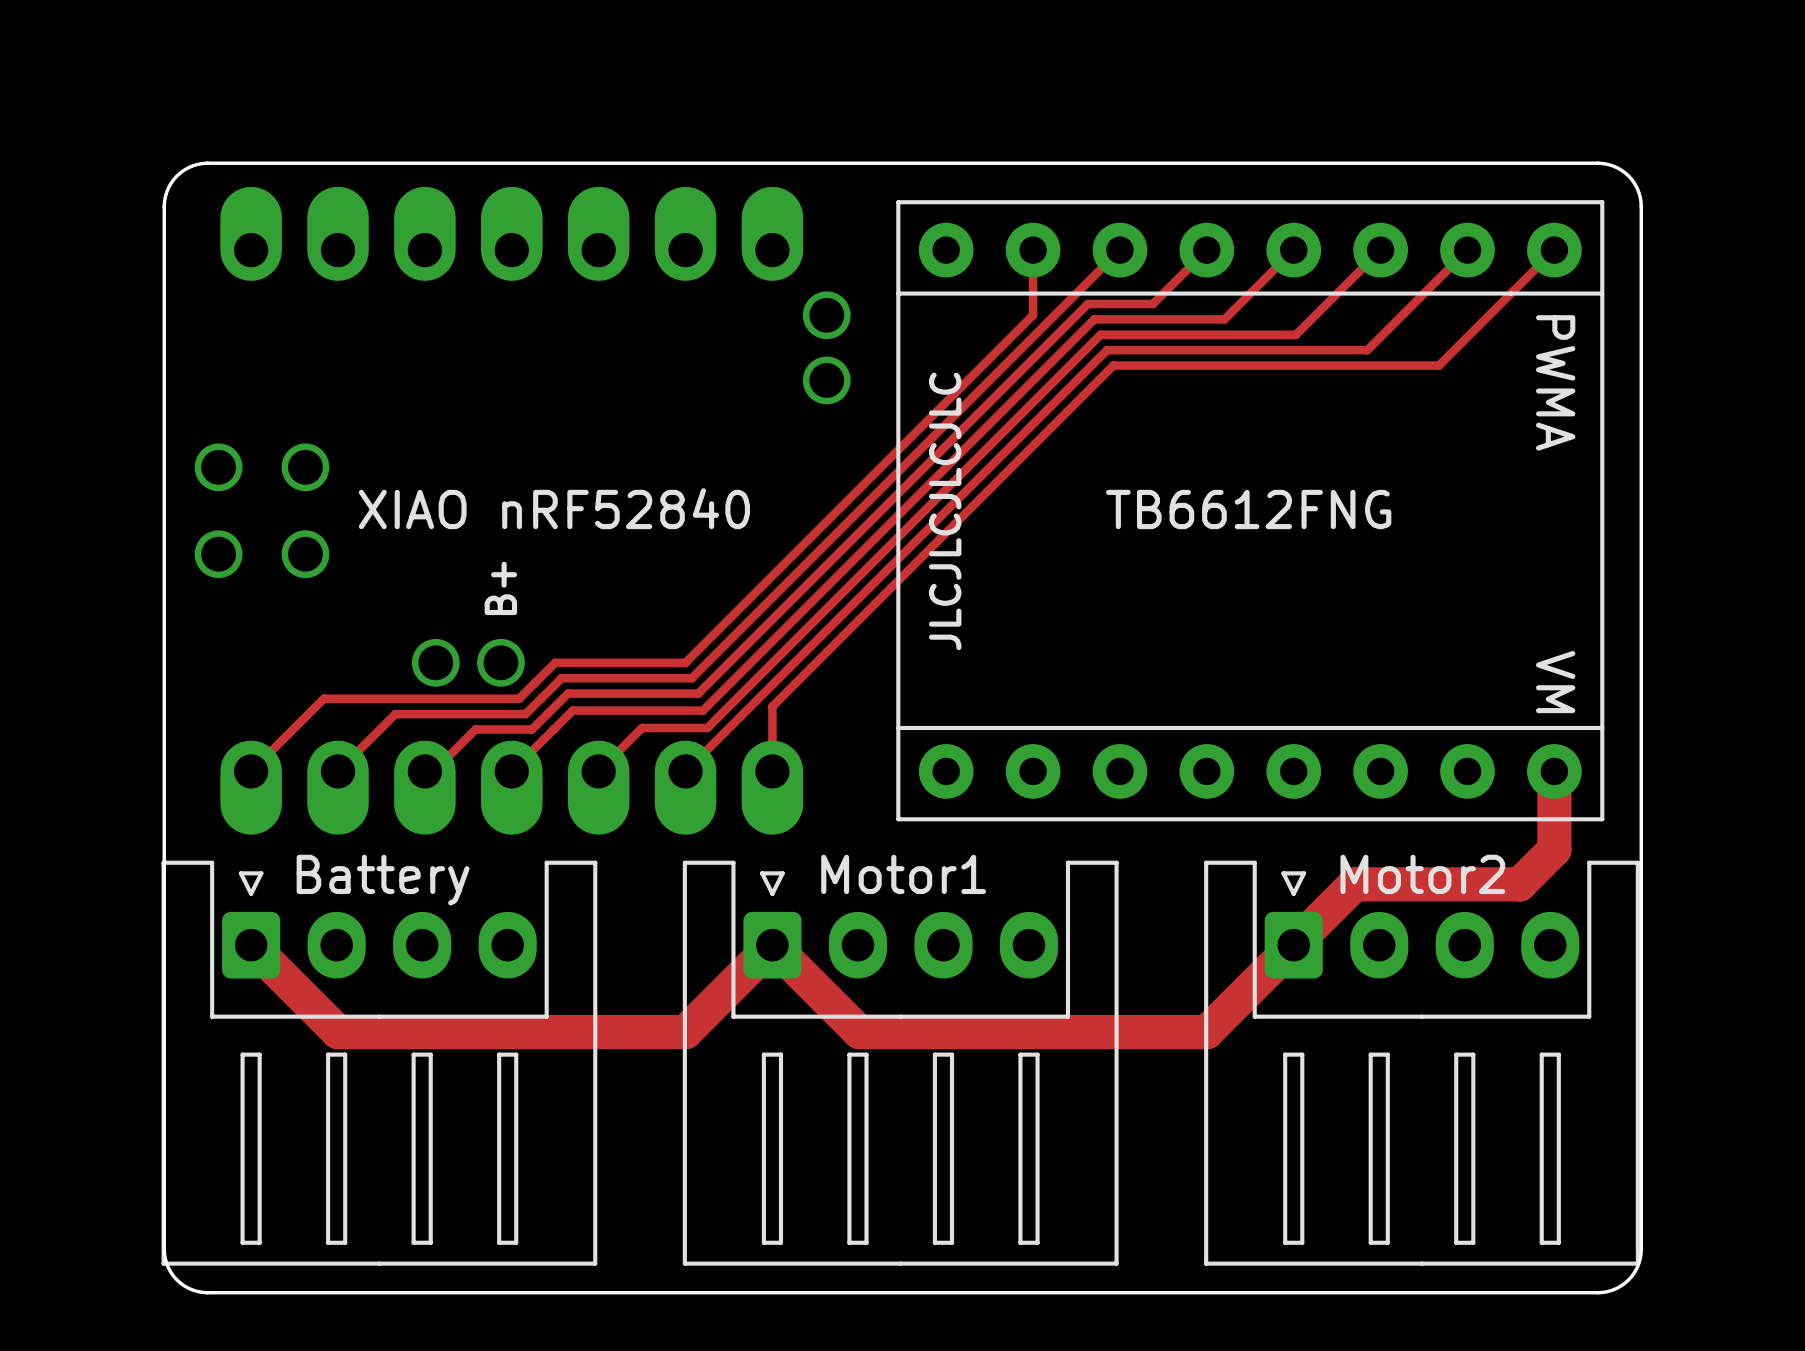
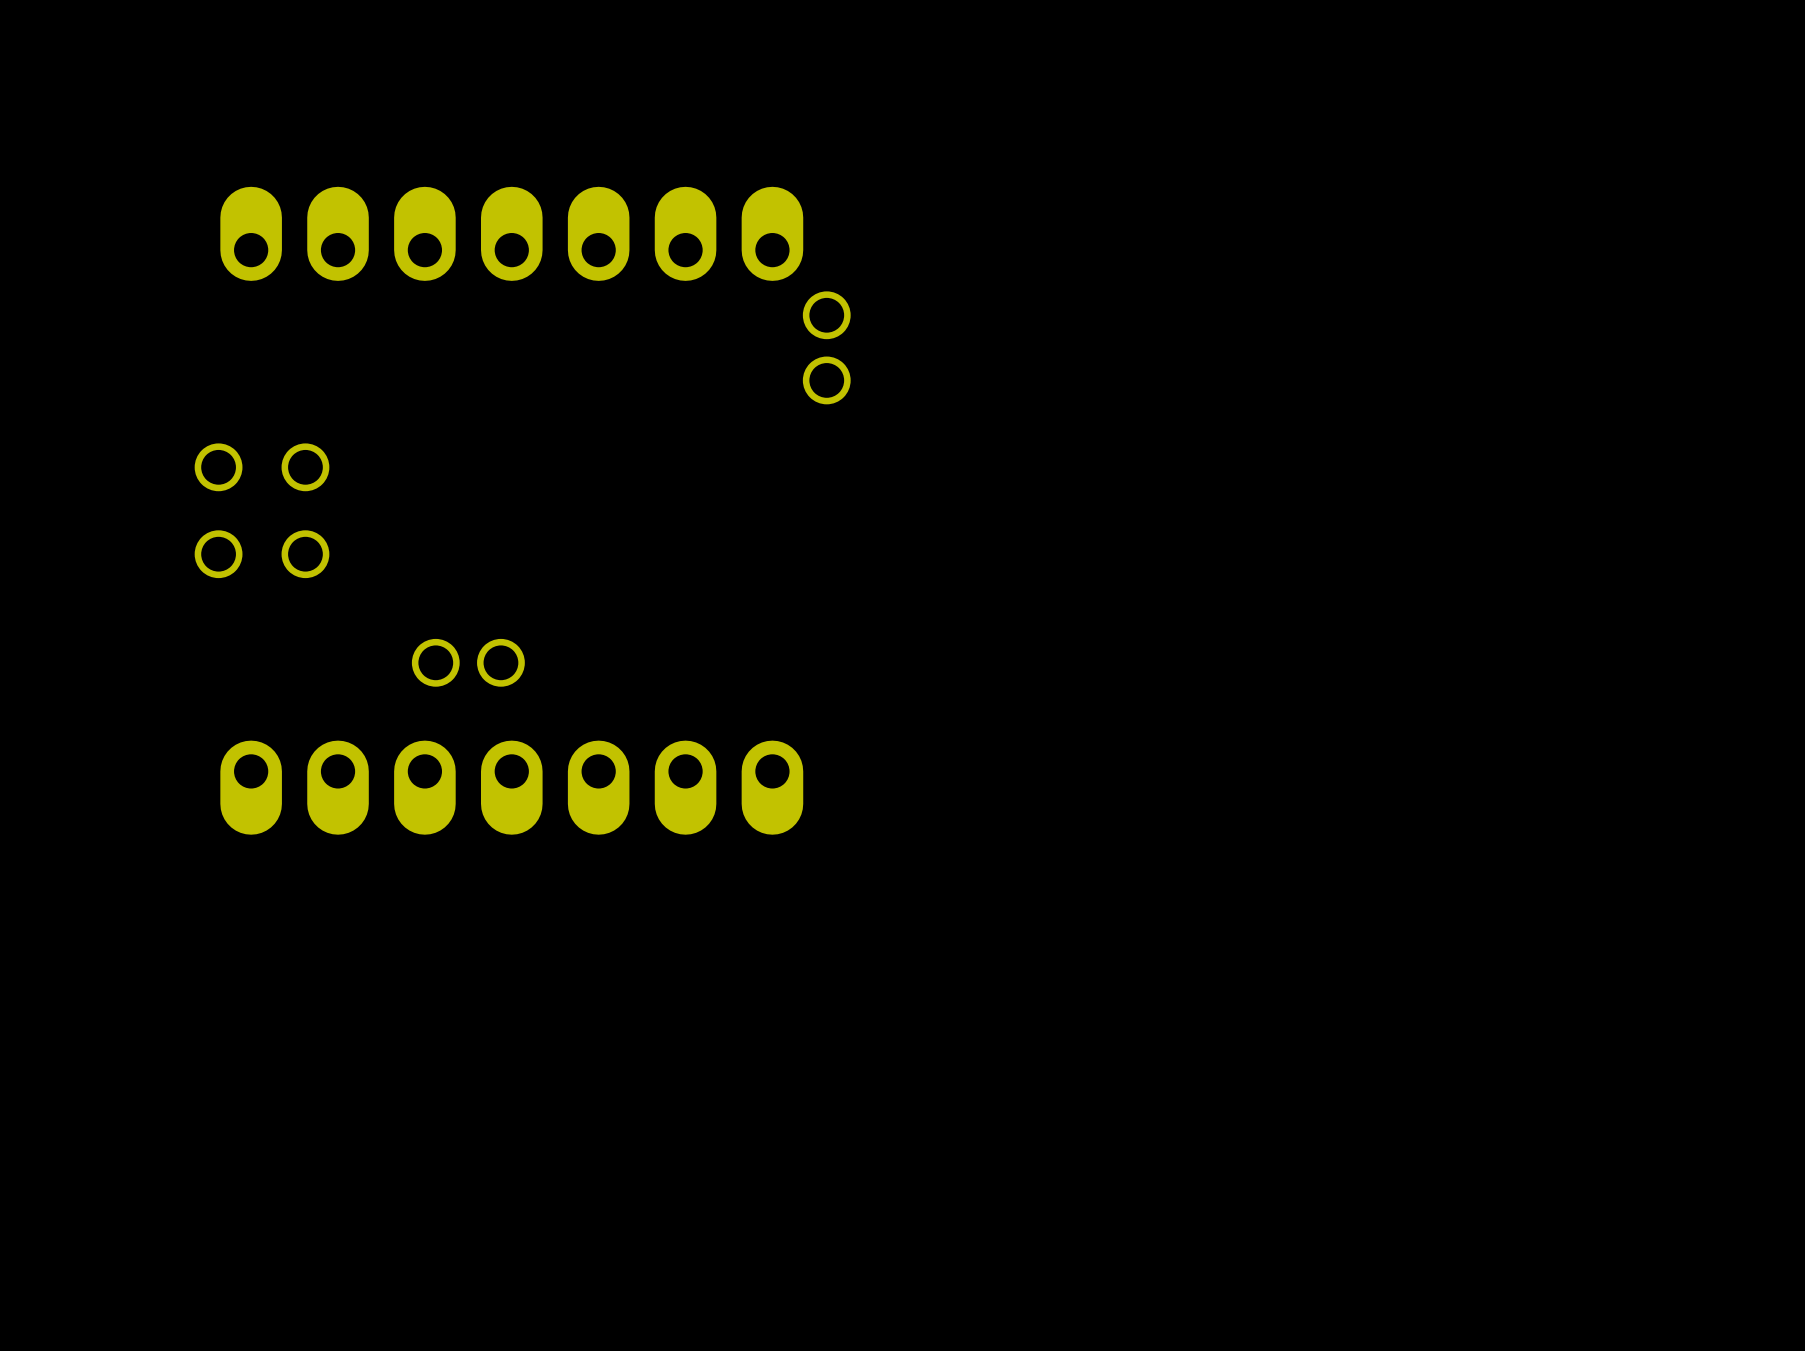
board edge: (207, 163) (1597, 163) (1612, 165) (1624, 172) (1636, 187) (1641, 206) (1641, 1249) (1638, 1263) (1631, 1276) (1616, 1288) (1597, 1292) (207, 1292) (193, 1290) (180, 1283) (168, 1268) (164, 1249) (164, 206) (168, 187) (176, 175) (193, 165) (207, 163) -> none
track: (1033, 250) (1033, 315) (685, 662) (555, 662) (519, 698) (323, 698) (251, 771) -> none
track: (1119, 250) (691, 678) (561, 678) (525, 714) (395, 714) (338, 771) -> none
track: (1206, 250) (1152, 303) (1087, 303) (698, 693) (567, 693) (531, 729) (475, 729) (433, 771) (424, 771) -> none
track: (1293, 250) (1224, 319) (1094, 319) (703, 710) (572, 710) (511, 771) -> none
track: (1380, 250) (1295, 334) (1100, 334) (707, 727) (642, 727) (598, 771) -> none
track: (1467, 250) (1367, 350) (1106, 350) (685, 771) -> none
track: (1554, 250) (1438, 365) (1113, 365) (772, 706) (772, 771) -> none
text: XIAO nRF52840 (554, 508) -> none
text: TB6612FNG (1248, 509) -> none
part: (1250, 510) -> none
text: JLCJLCJLCJLC (945, 511) -> none
text: B+ (500, 588) -> none
track: (1554, 771) (1554, 849) (1519, 884) (1354, 884) (1206, 1032) (859, 1032) (772, 945) (685, 1032) (338, 1032) (251, 945) -> none
Battery: (379, 1063) -> none
Motor1: (900, 1063) -> none
Motor2: (1422, 1063) -> none

